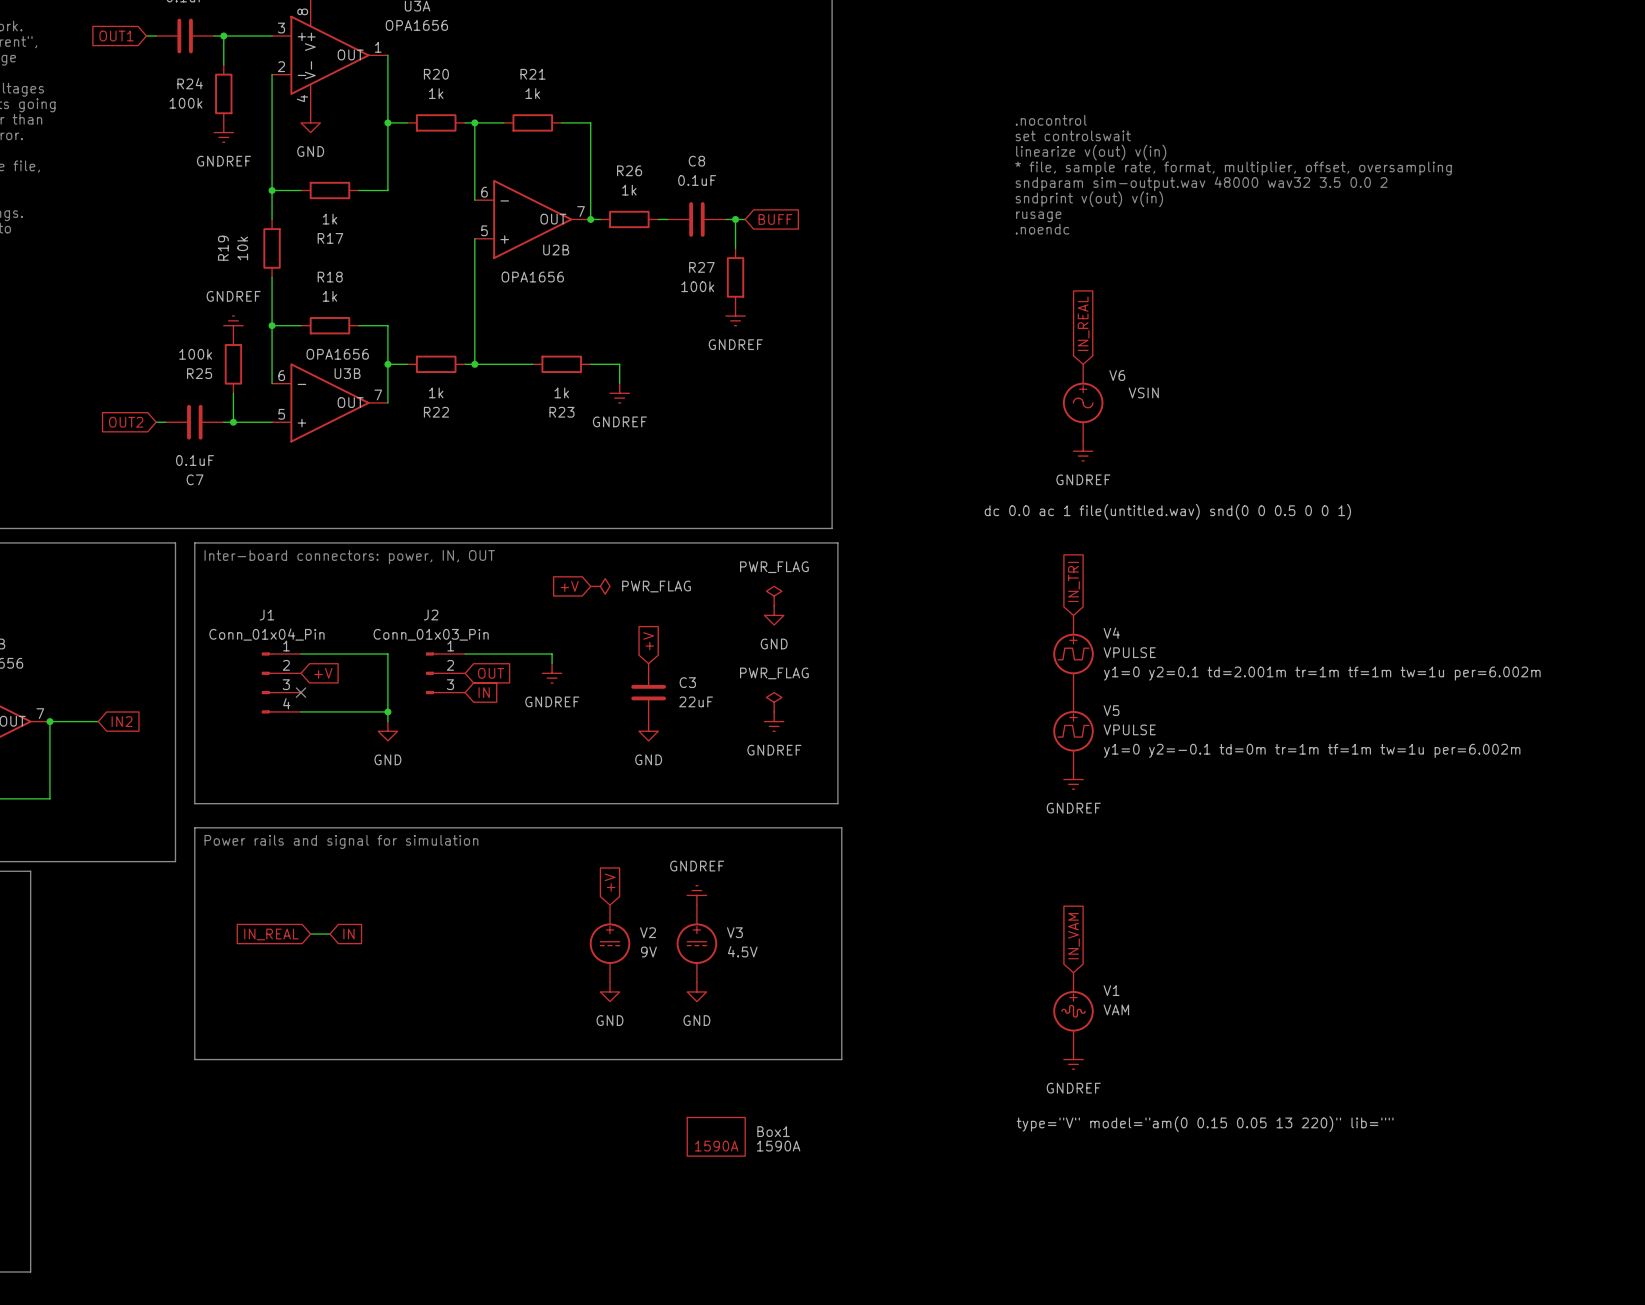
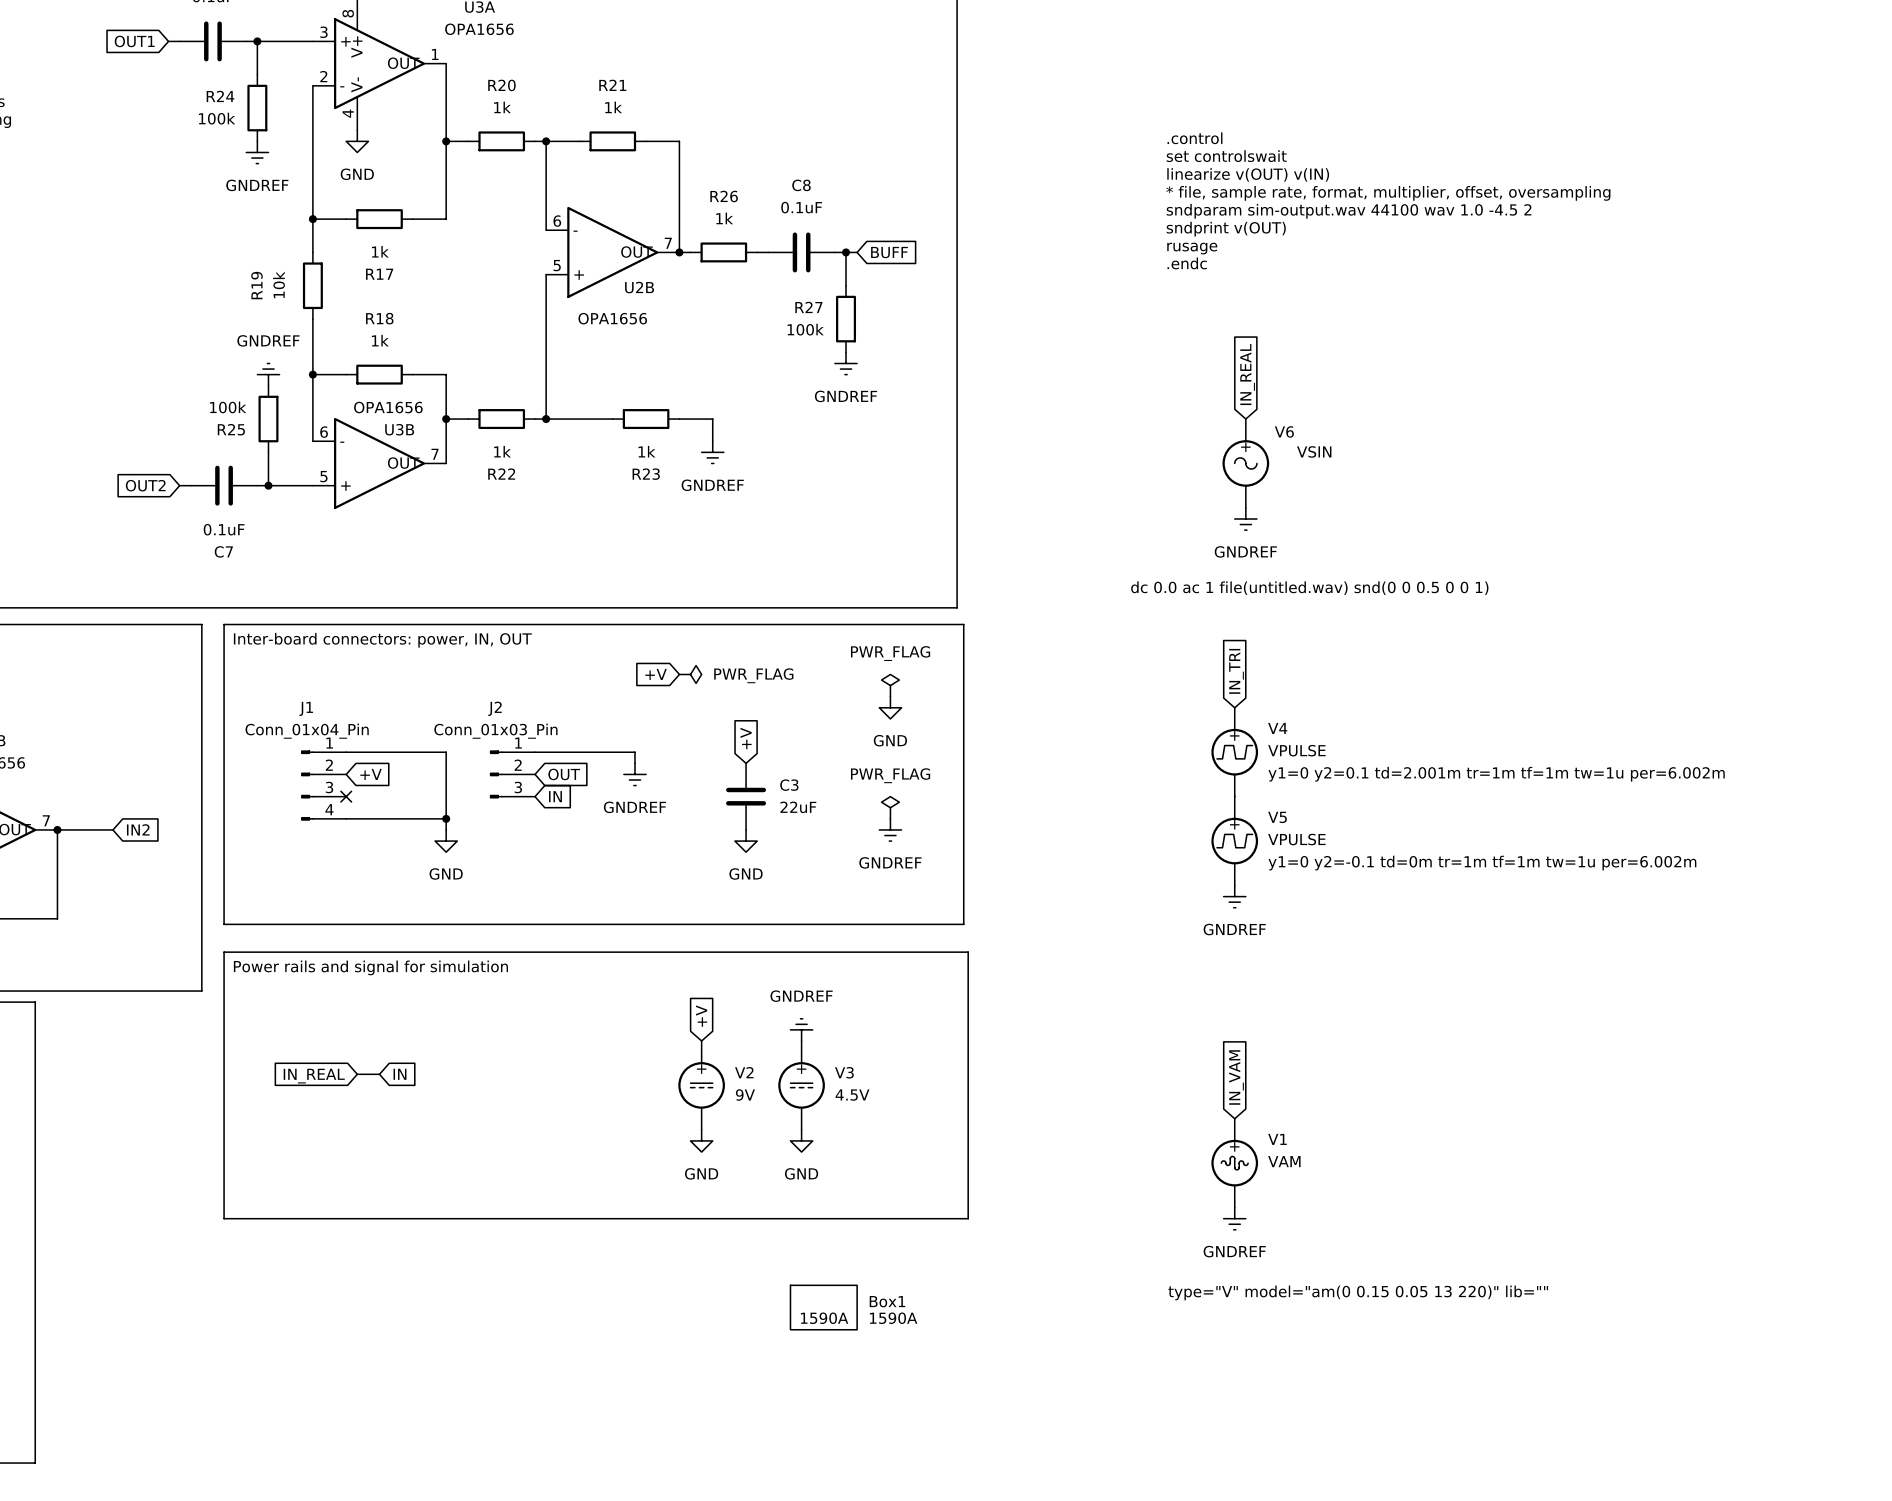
text: .nocontrol (1051, 120) -> .control (1194, 138)
text: linearize v(out) v(in) (1091, 152) -> linearize v(OUT) v(IN) (1248, 174)
text: sndparam sim-output.wav 48000 wav32 3.5 0.0 2 (1201, 183) -> sndparam sim-output.wav 44100 wav 1.0 -4.5 2 (1349, 211)
text: sndprint v(out) v(in) (1089, 199) -> sndprint v(OUT) (1226, 229)
text: .noendc (1042, 229) -> .endc (1187, 263)

